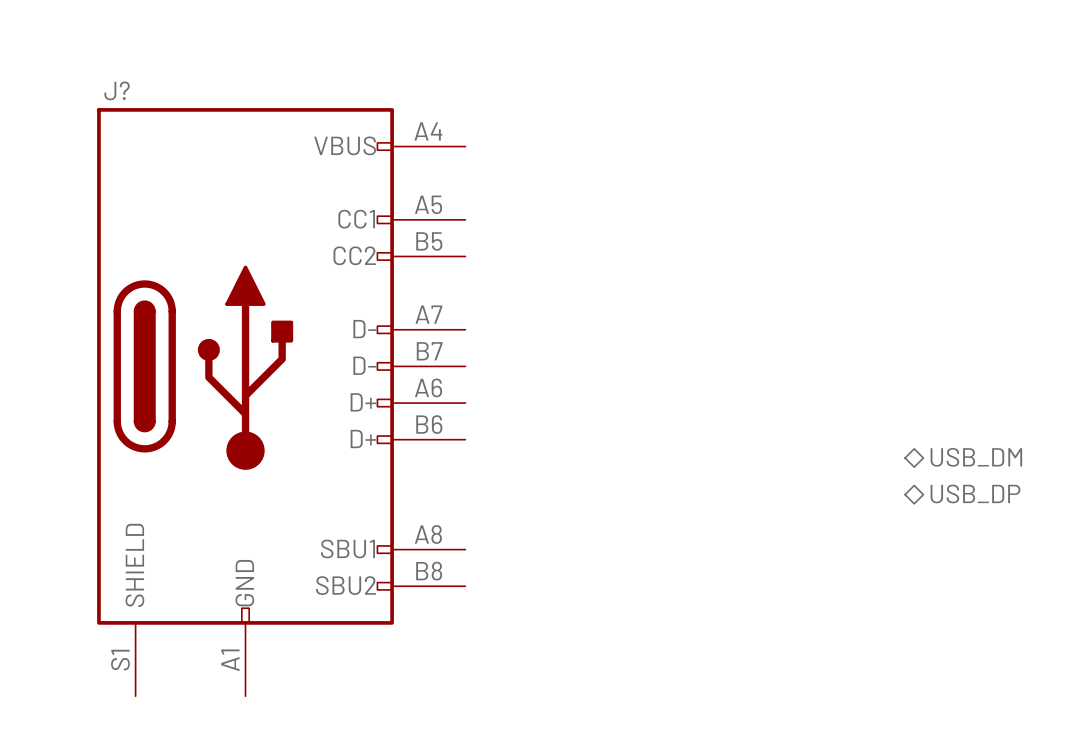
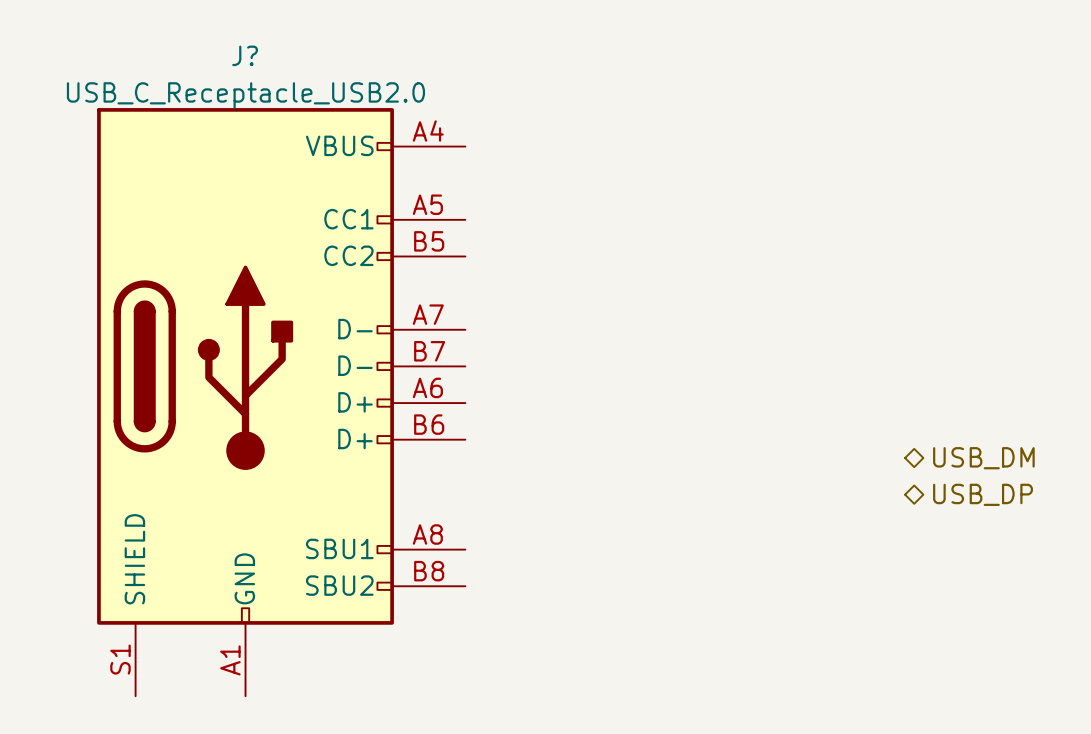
J? name position: J? (117, 90) -> J? (245, 55)
J? value: none -> USB_C_Receptacle_USB2.0 (245, 95)

